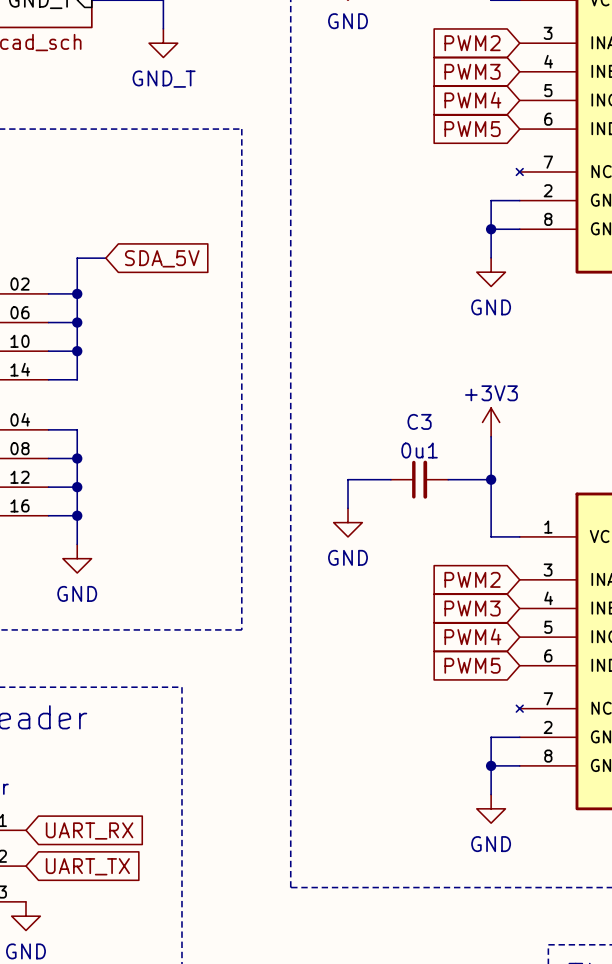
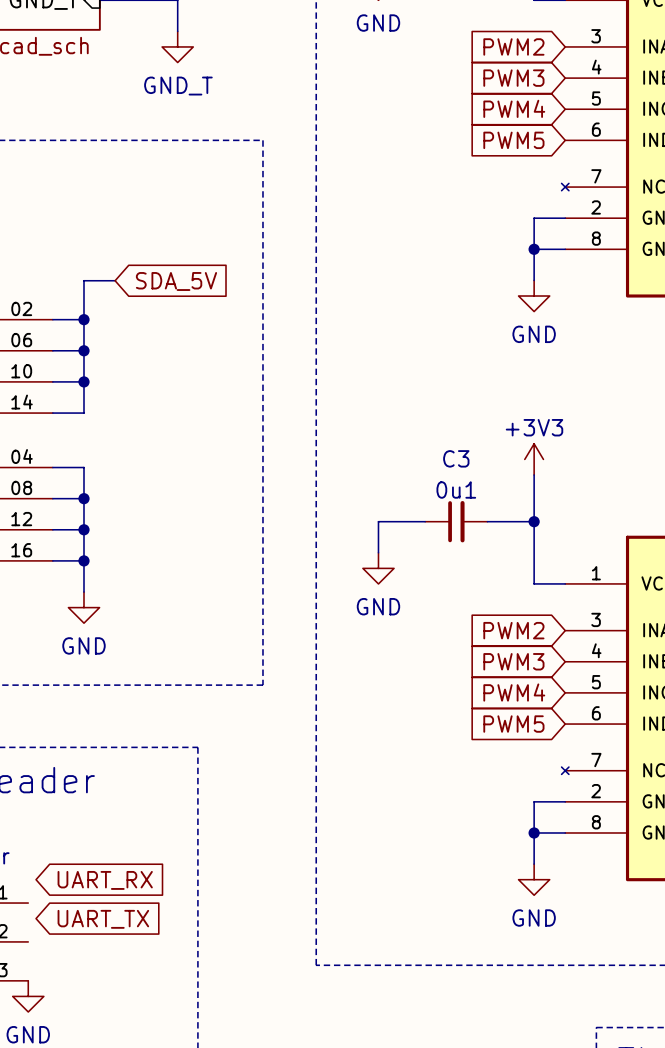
global label position: UART_RX (89, 830) -> UART_RX (105, 880)
global label position: UART_TX (87, 866) -> UART_TX (103, 919)

